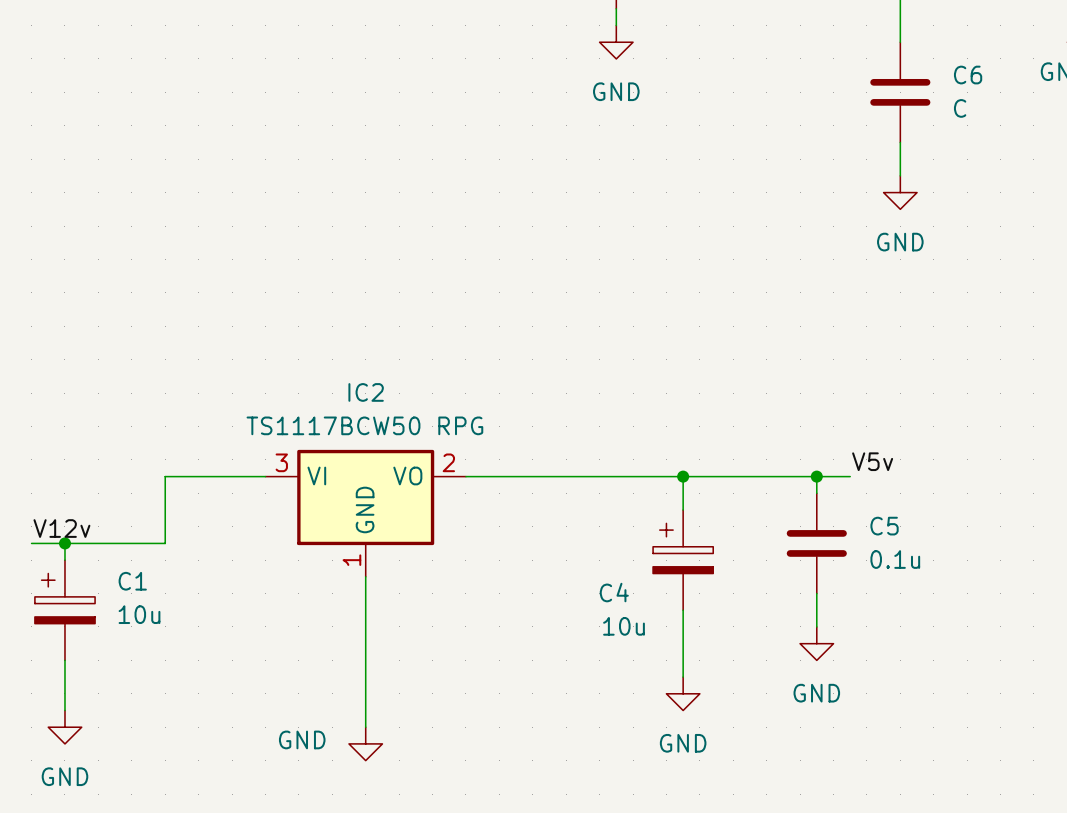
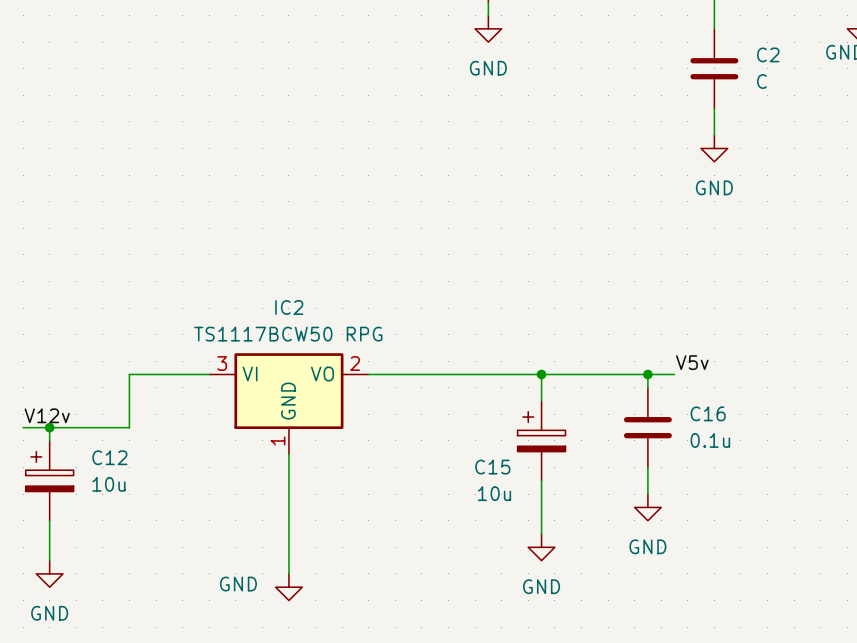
C6 name: C6 (968, 75) -> C2 (768, 54)
C5 name: C5 (884, 526) -> C16 (708, 413)
C1 name: C1 (132, 581) -> C12 (109, 457)
C4 name: C4 (614, 592) -> C15 (492, 467)

